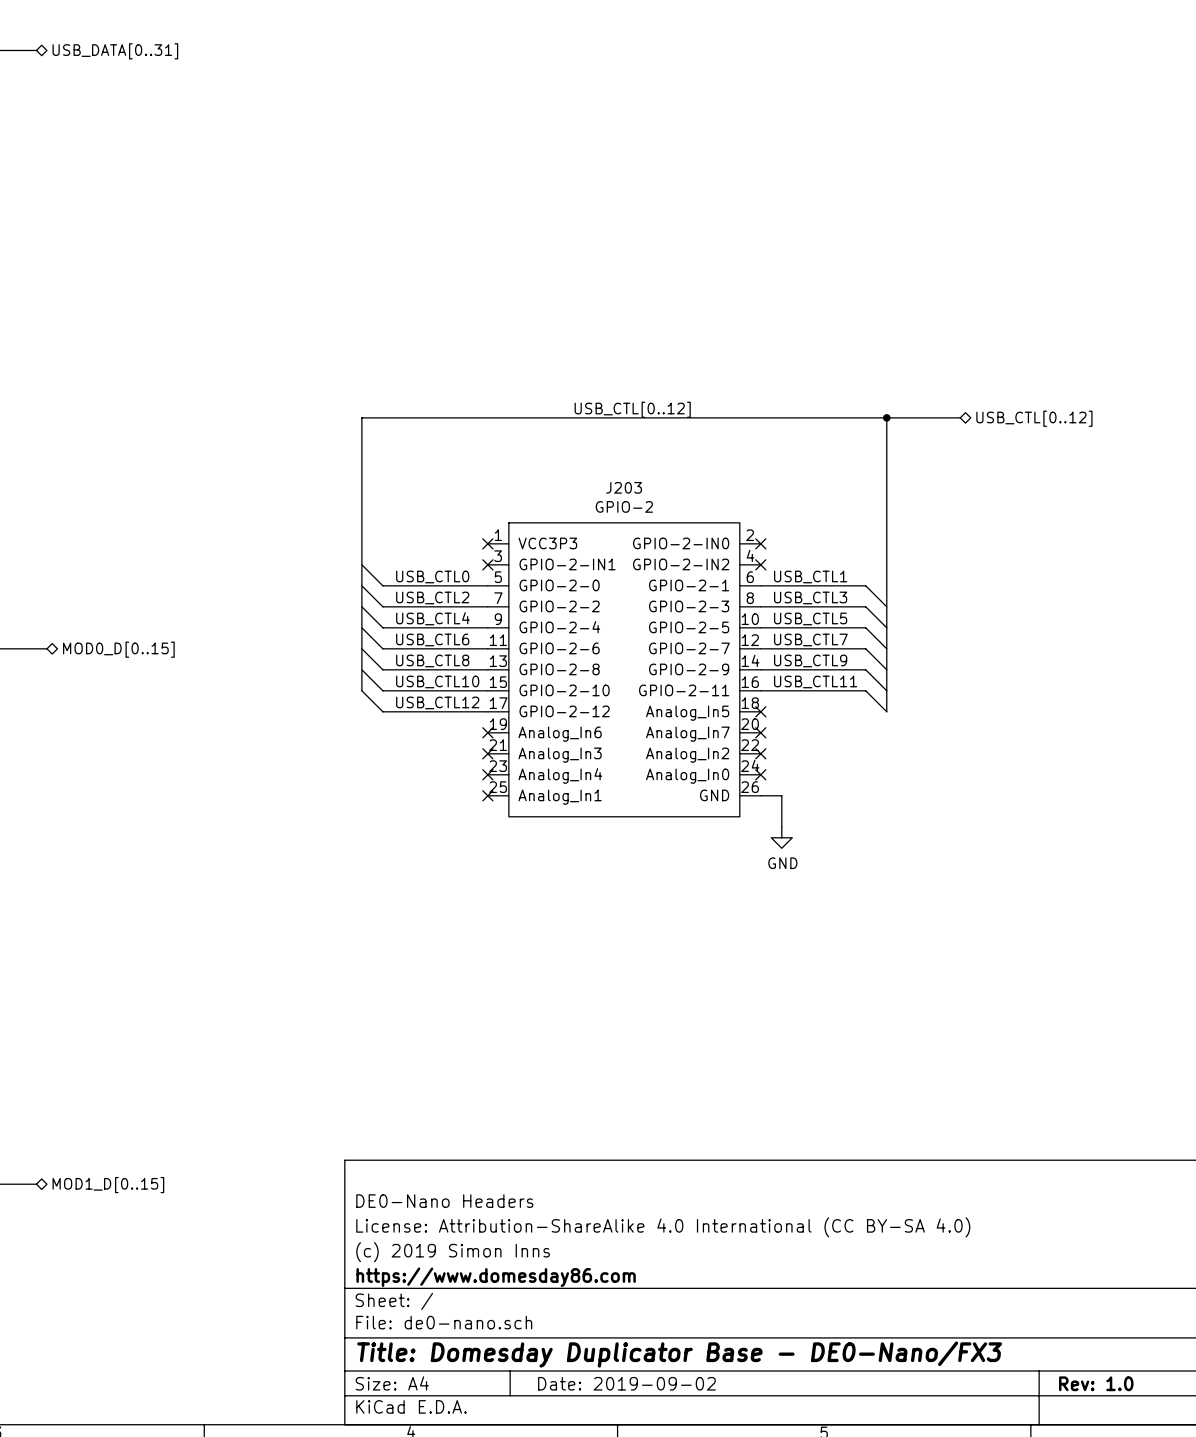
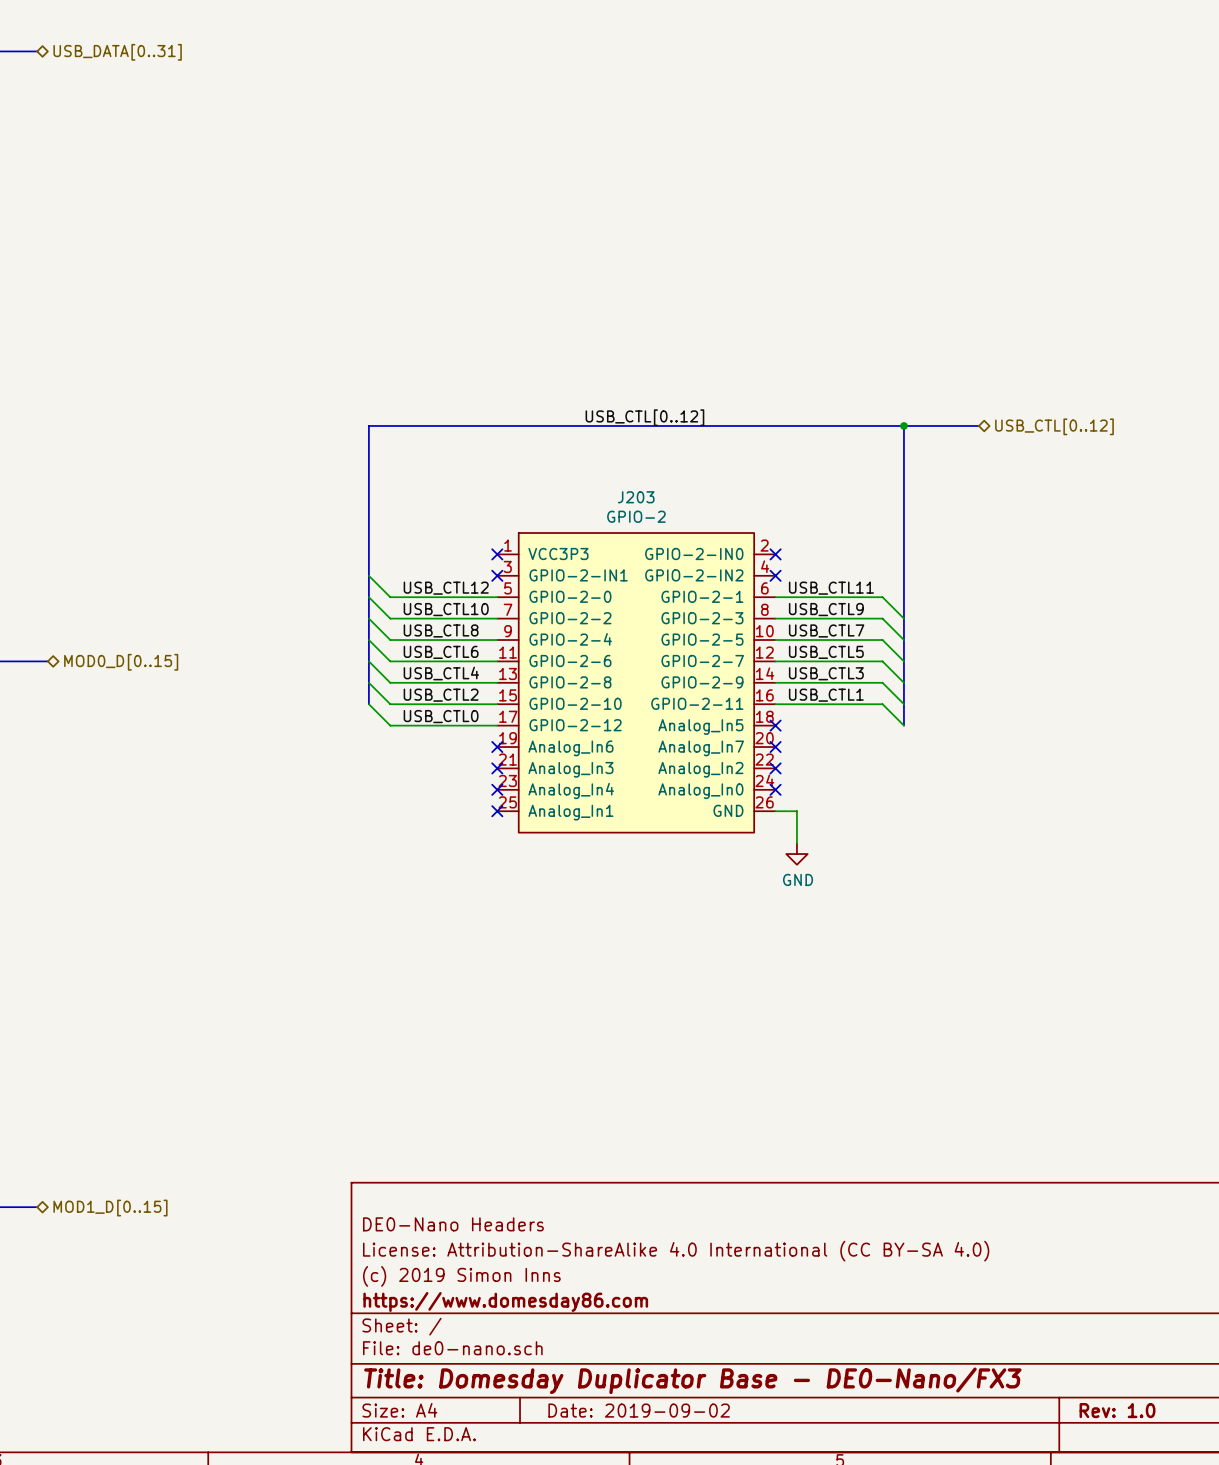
label: USB_CTL0 (432, 576) -> USB_CTL12 (446, 588)
label: USB_CTL1 (810, 576) -> USB_CTL11 (831, 588)
label: USB_CTL2 (432, 597) -> USB_CTL10 (446, 609)
label: USB_CTL3 (810, 597) -> USB_CTL9 (826, 609)
label: USB_CTL4 (432, 618) -> USB_CTL8 (441, 630)
label: USB_CTL5 (810, 618) -> USB_CTL7 (826, 630)
label: USB_CTL7 (810, 639) -> USB_CTL5 (826, 652)
label: USB_CTL8 (432, 660) -> USB_CTL4 (441, 673)
label: USB_CTL9 (810, 660) -> USB_CTL3 (826, 673)
label: USB_CTL10 (437, 681) -> USB_CTL2 (441, 695)
label: USB_CTL11 (815, 681) -> USB_CTL1 (826, 695)
label: USB_CTL12 (437, 702) -> USB_CTL0 (441, 716)

